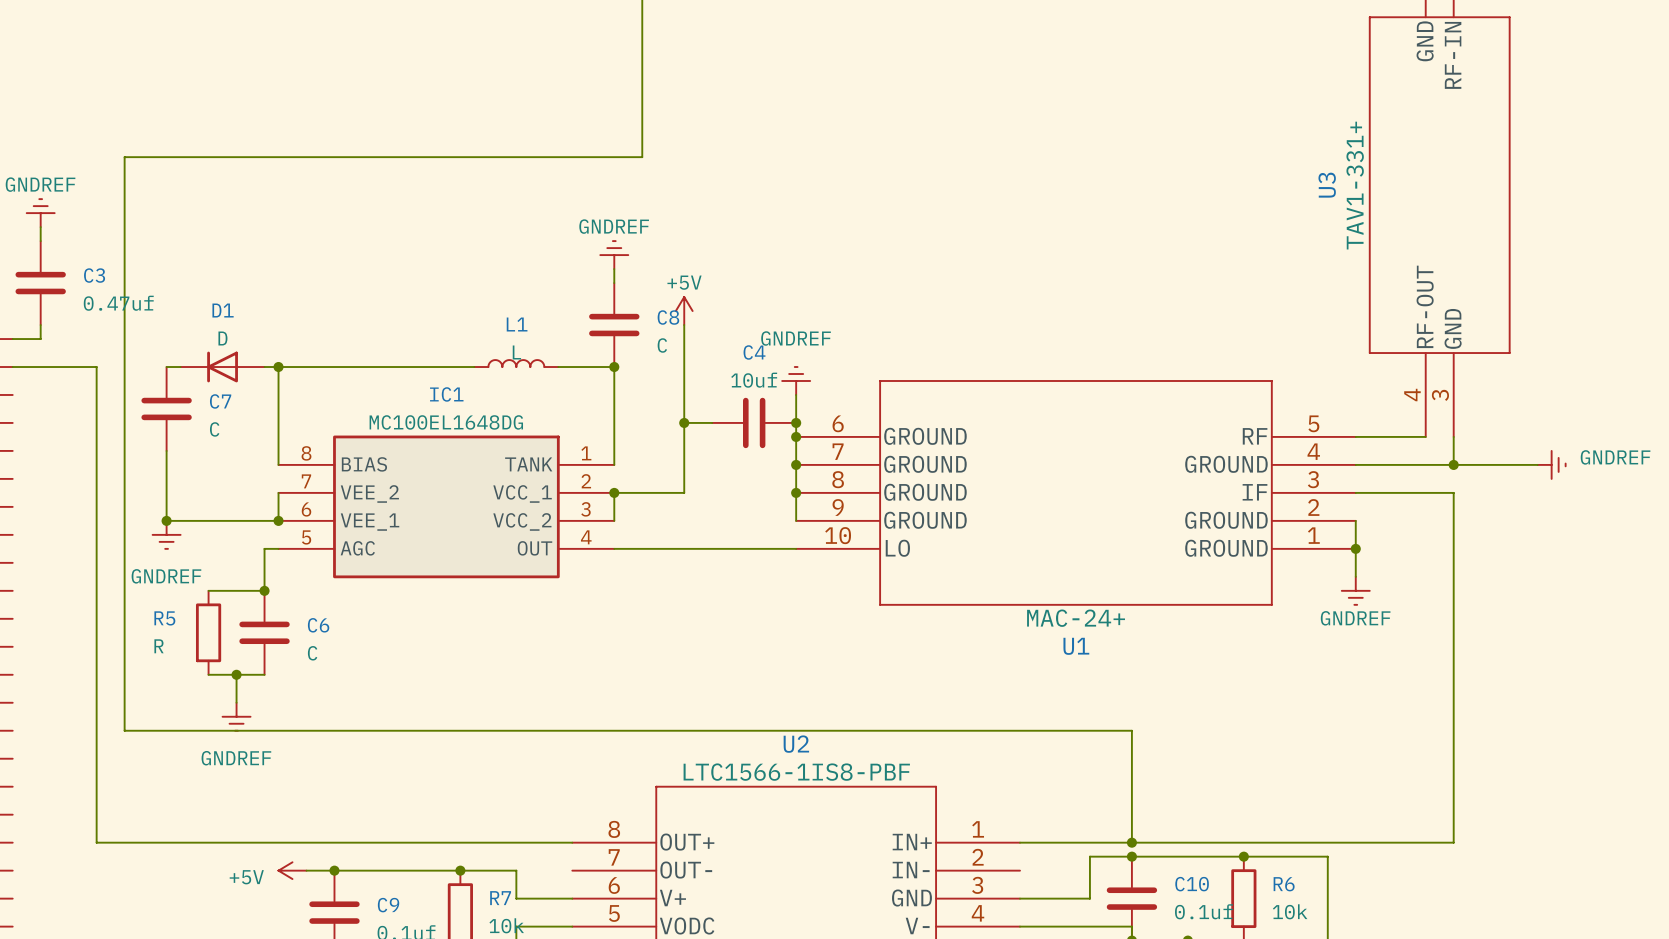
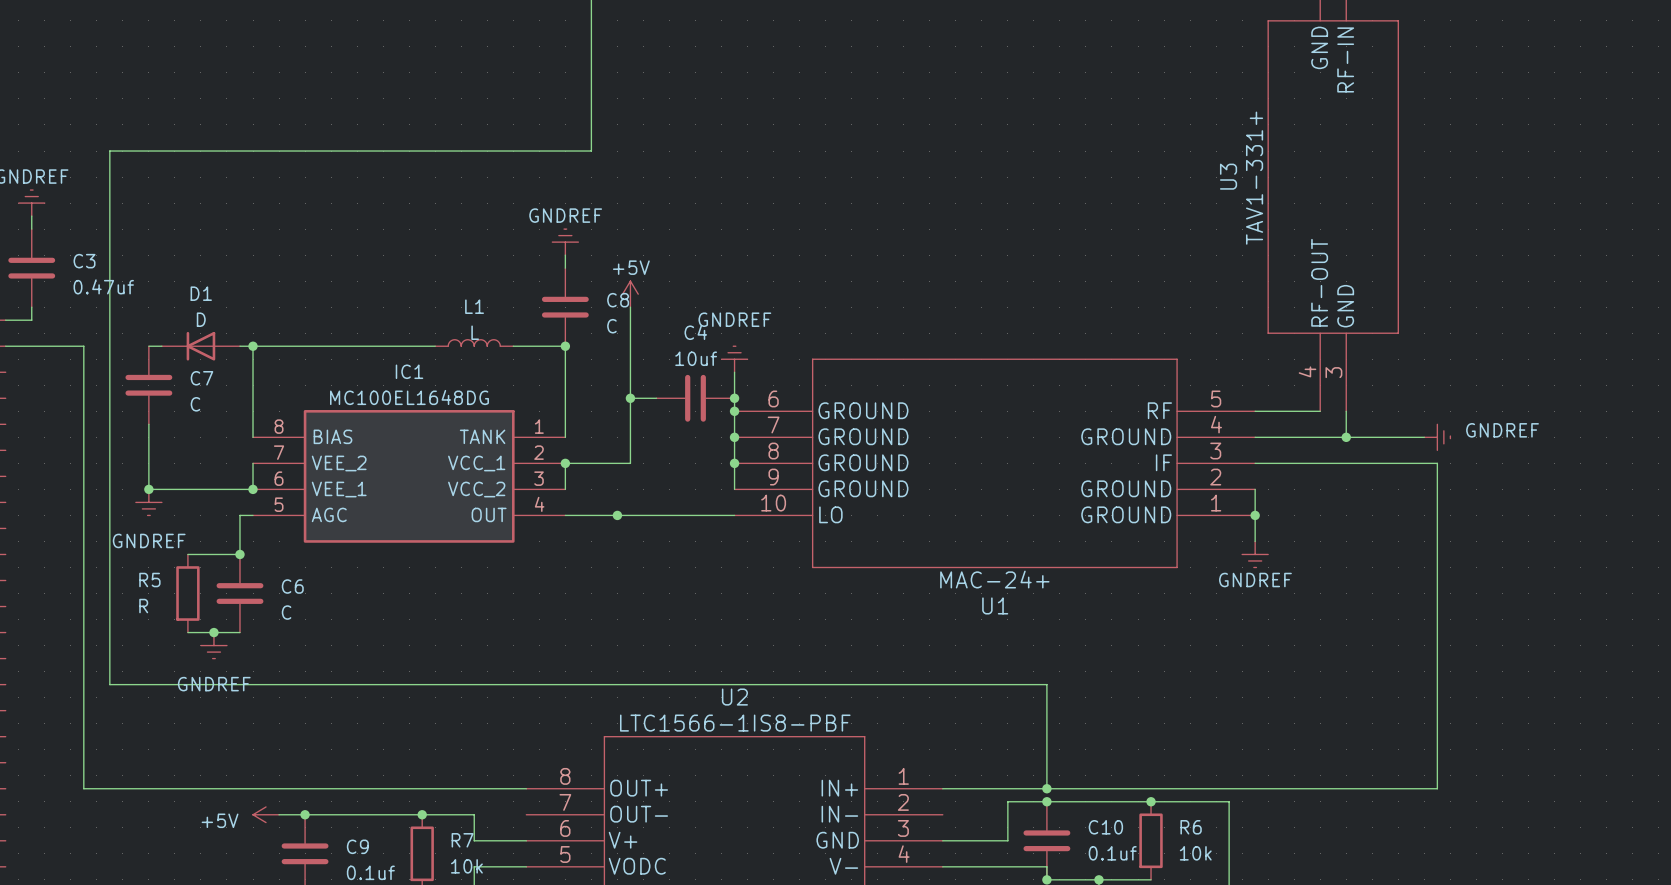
wire: (1453, 492) (1453, 842) -> (1346, 463) (1437, 463) (1437, 788) (1346, 788)
junction: none -> (617, 515)
power symbol position: GNDREF (236, 716) -> GNDREF (213, 645)

